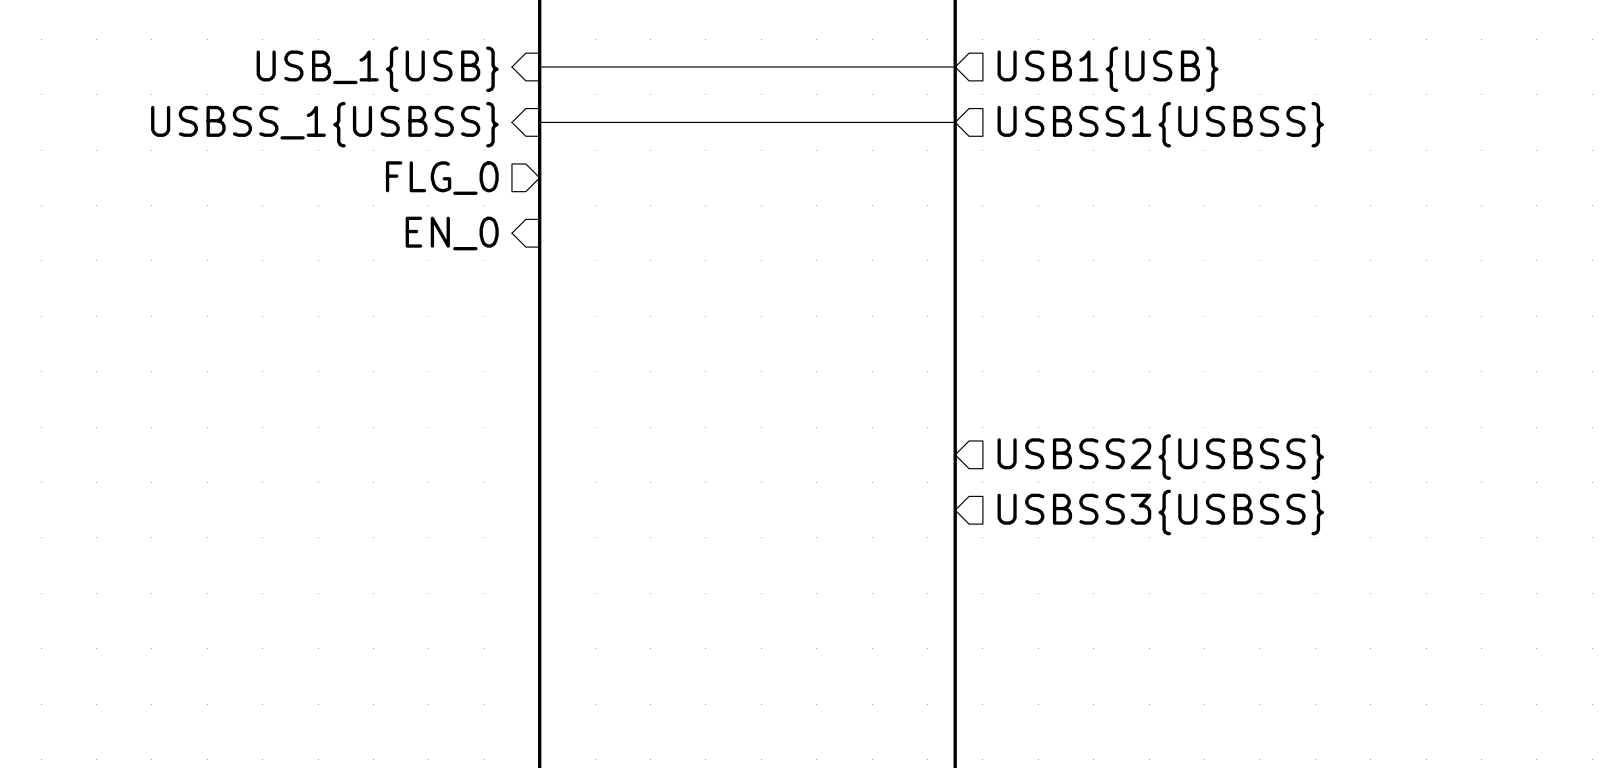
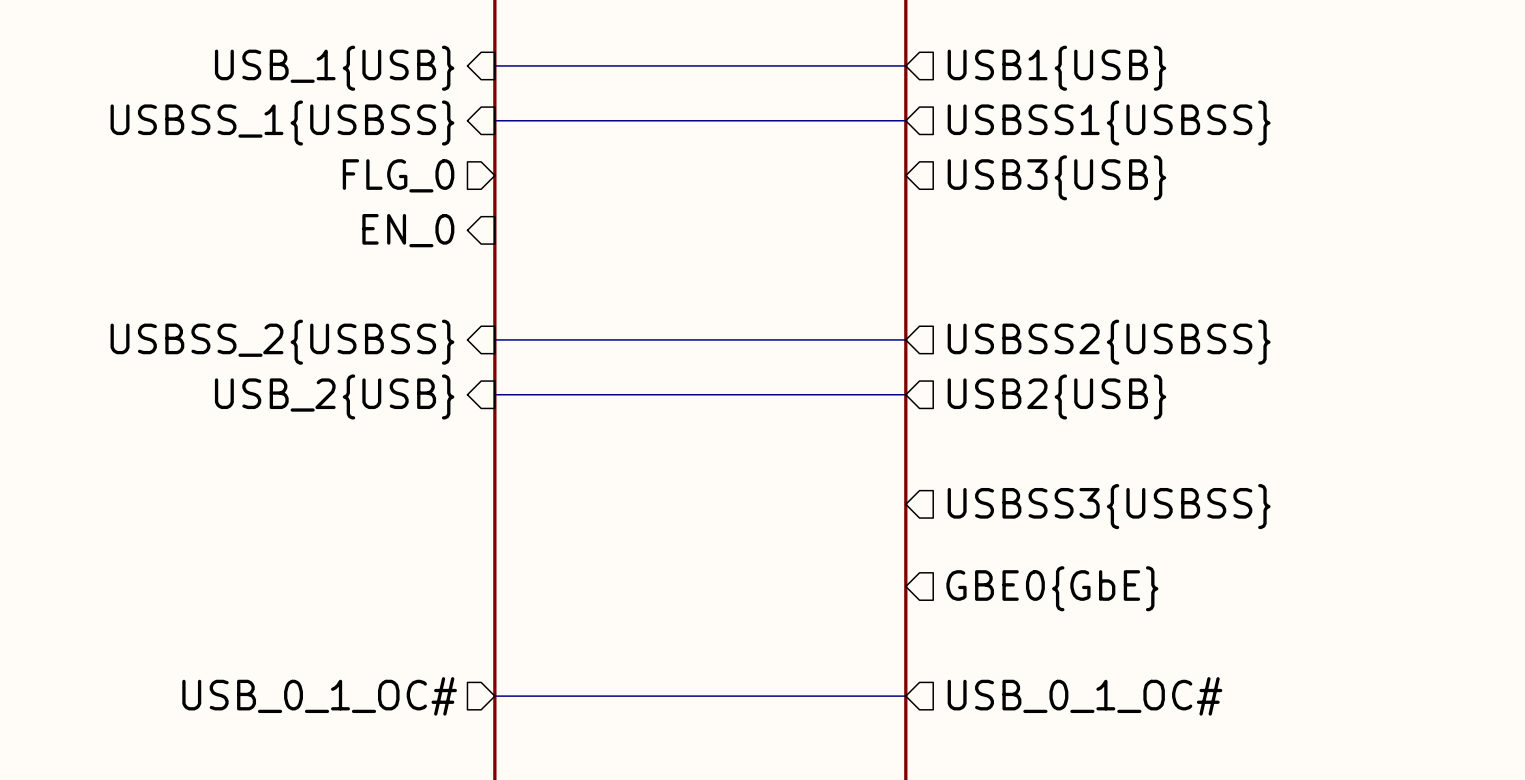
sheet pin: none -> USB3{USB} (1056, 177)
bus: none -> (494, 339) (905, 339)
sheet pin: none -> USBSS_2{USBSS} (282, 342)
bus: none -> (494, 394) (905, 394)
sheet pin: none -> USB_2{USB} (334, 396)
sheet pin: none -> USB2{USB} (1056, 396)
sheet pin position: USBSS2{USBSS} (1160, 457) -> USBSS2{USBSS} (1109, 342)
sheet pin: none -> GBE0{GbE} (1052, 588)
sheet pin: none -> USB_0_1_OC# (319, 696)
wire: none -> (494, 696) (905, 696)
sheet pin: none -> USB_0_1_OC# (1084, 696)

